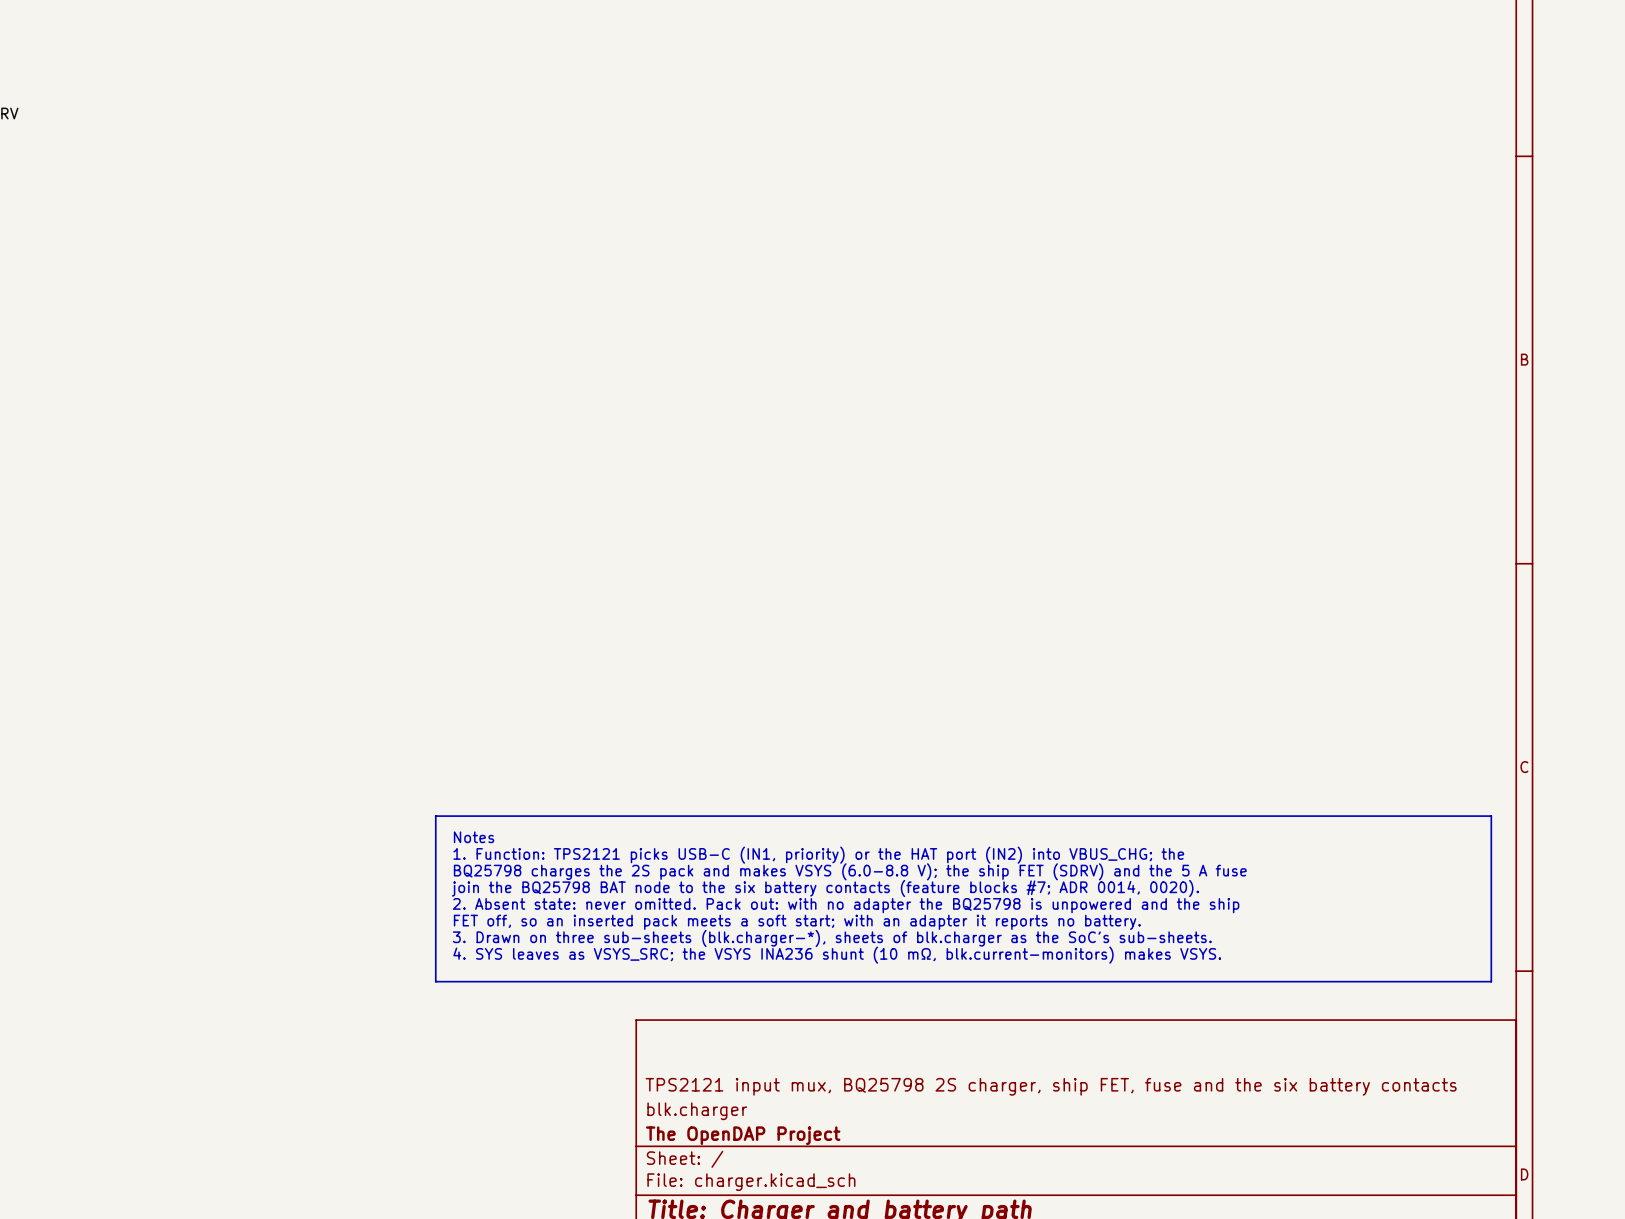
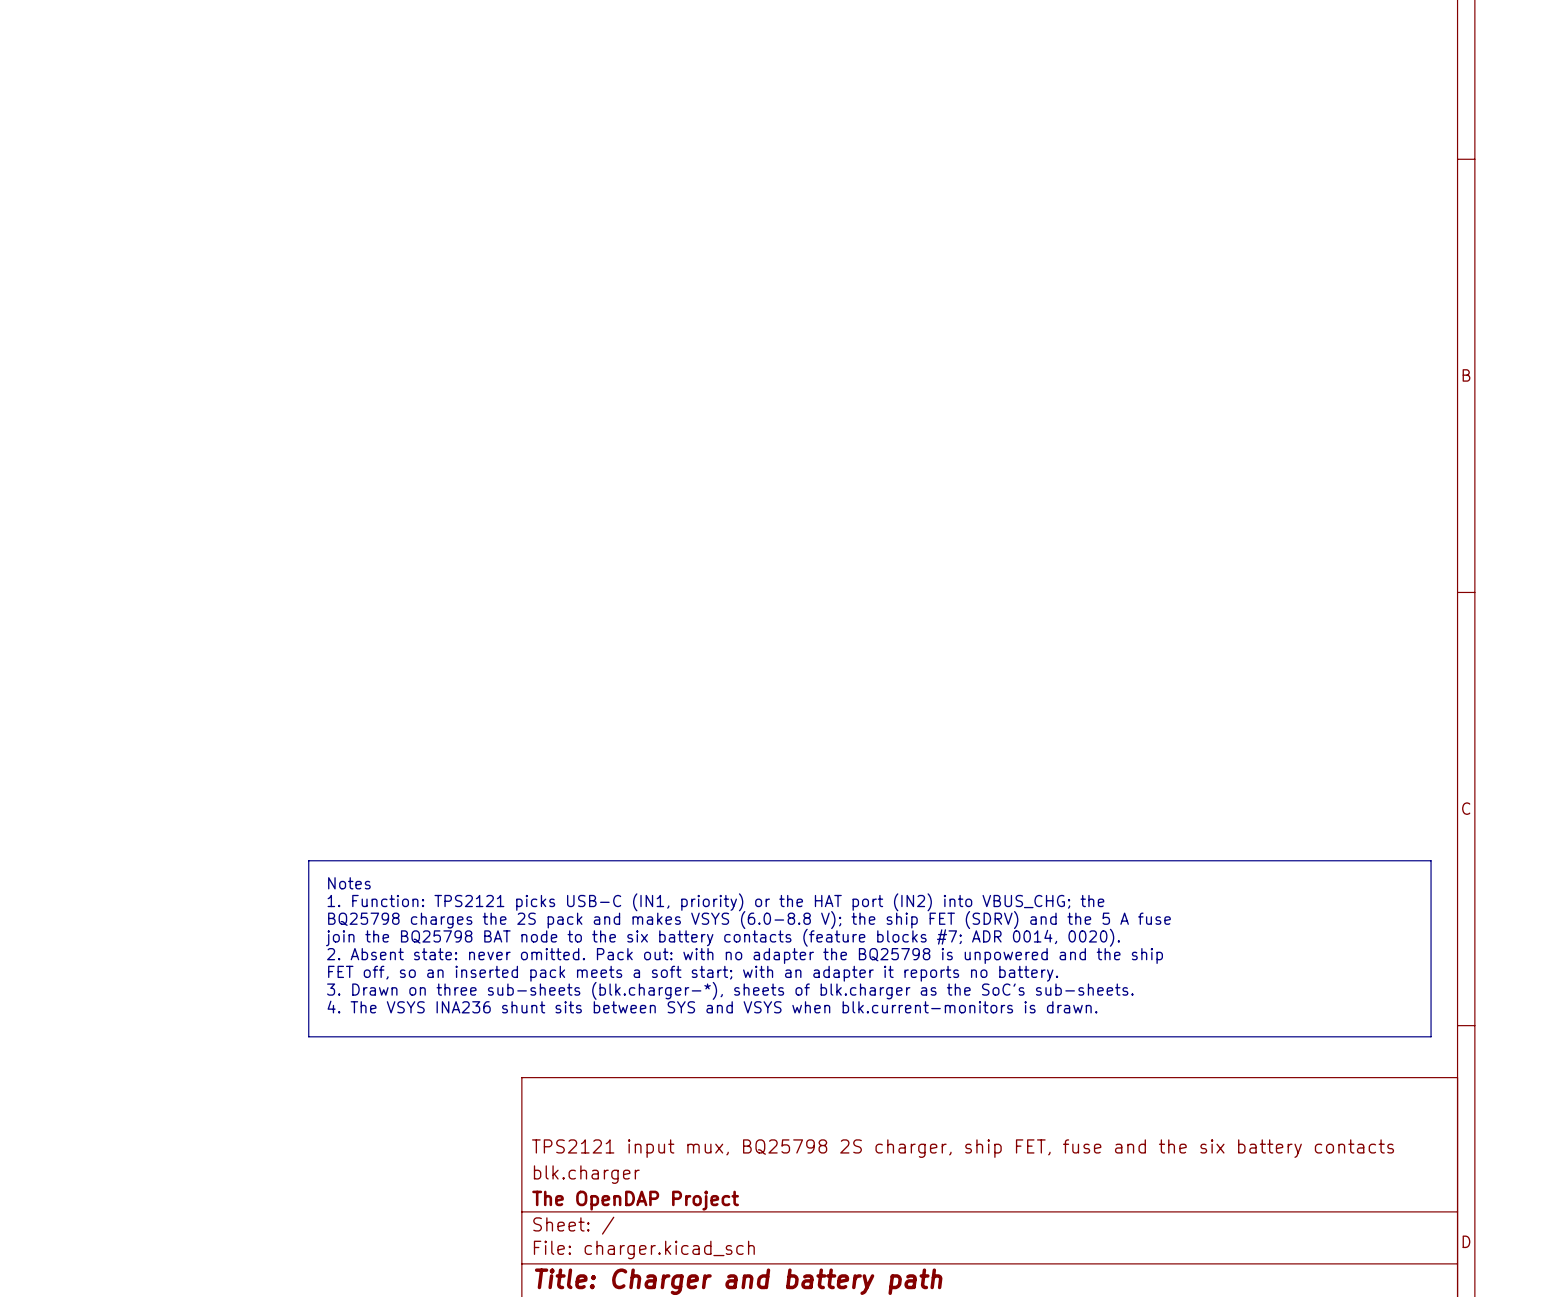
text: 4. SYS leaves as VSYS_SRC; the VSYS INA236 shunt (10 mΩ, blk.current-monitors) makes VSYS. (837, 955) -> 4. The VSYS INA236 shunt sits between SYS and VSYS when blk.current-monitors is drawn. (712, 1007)

